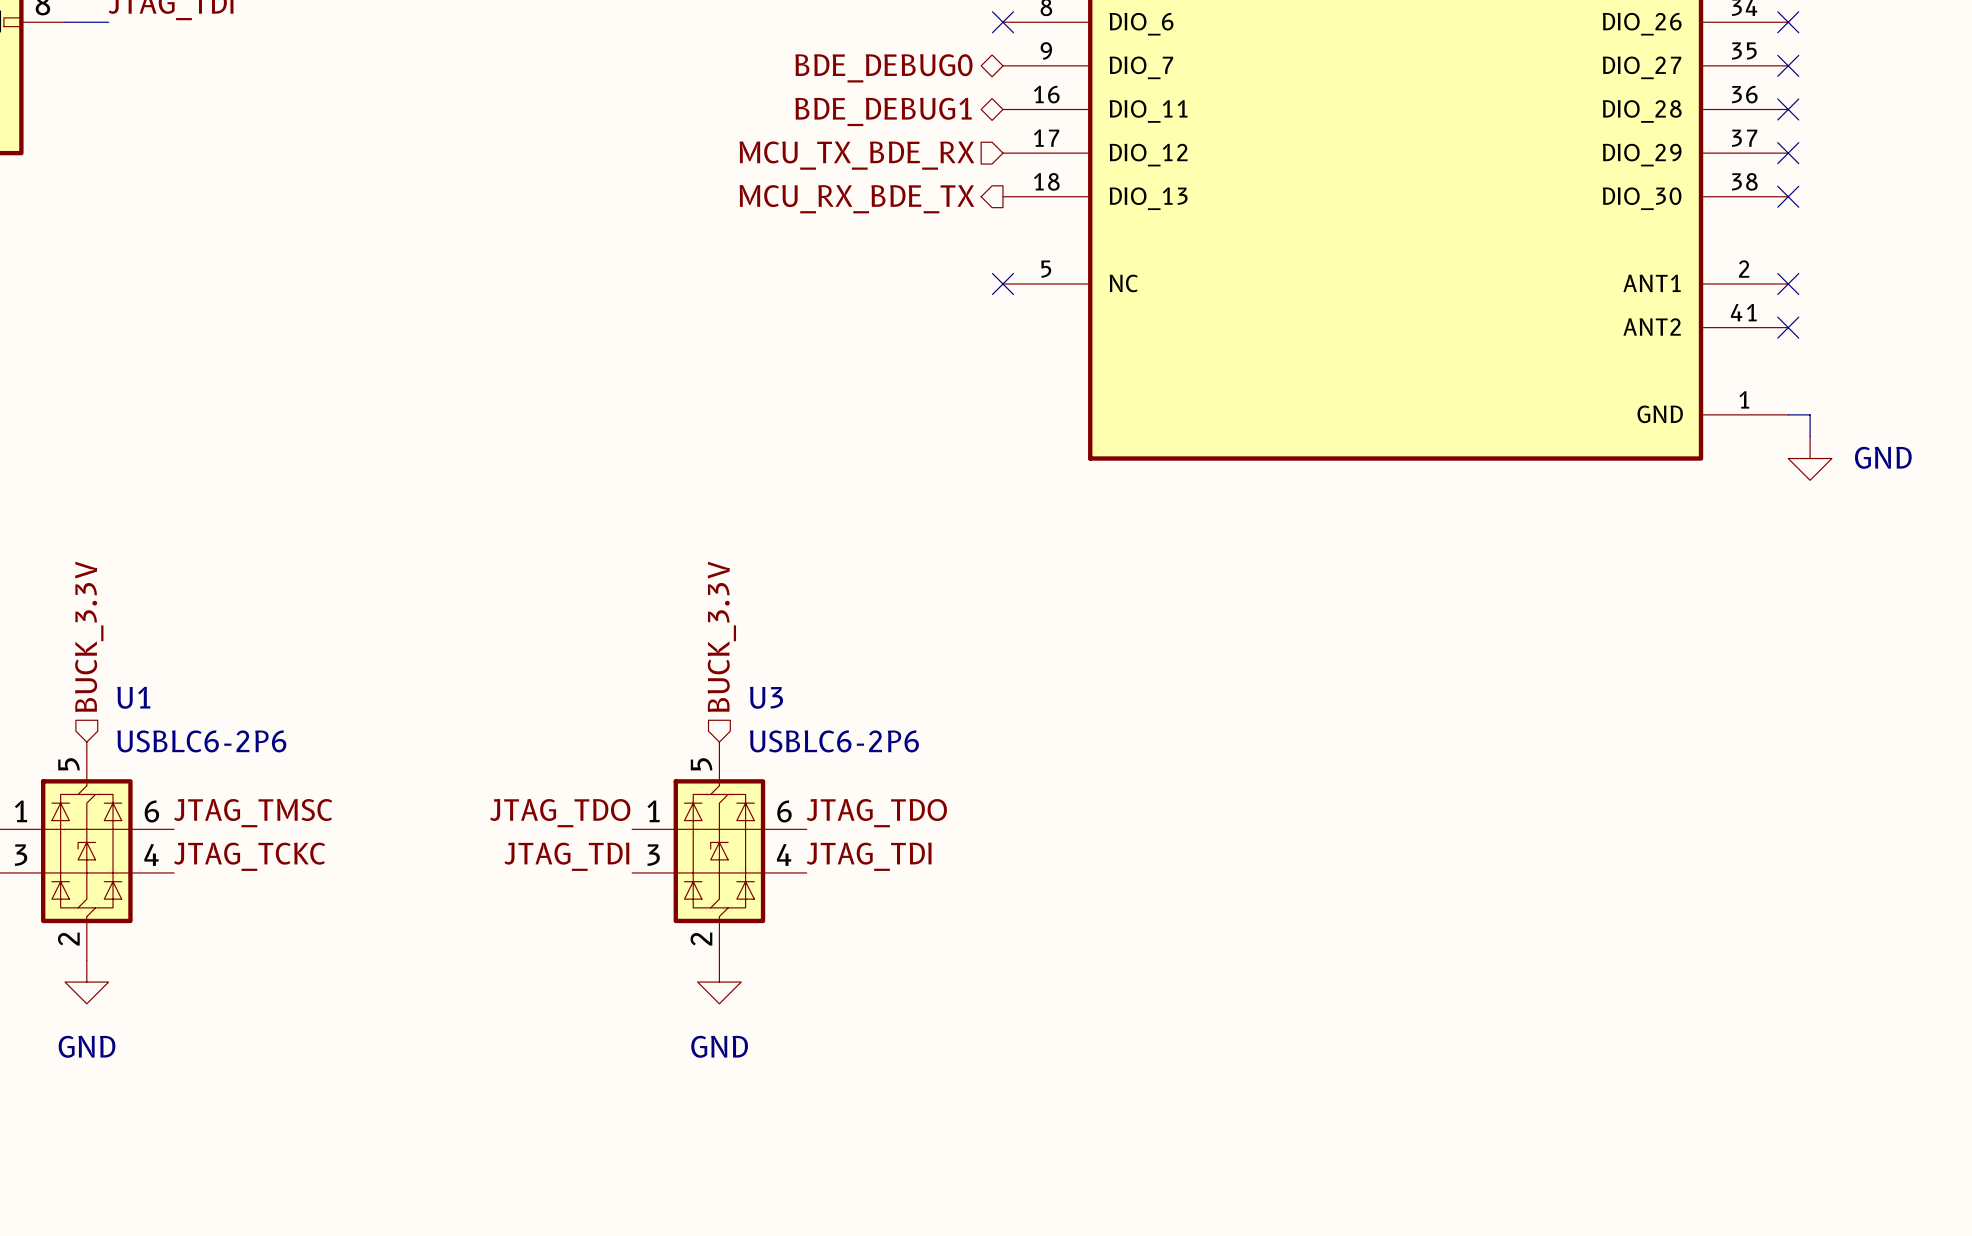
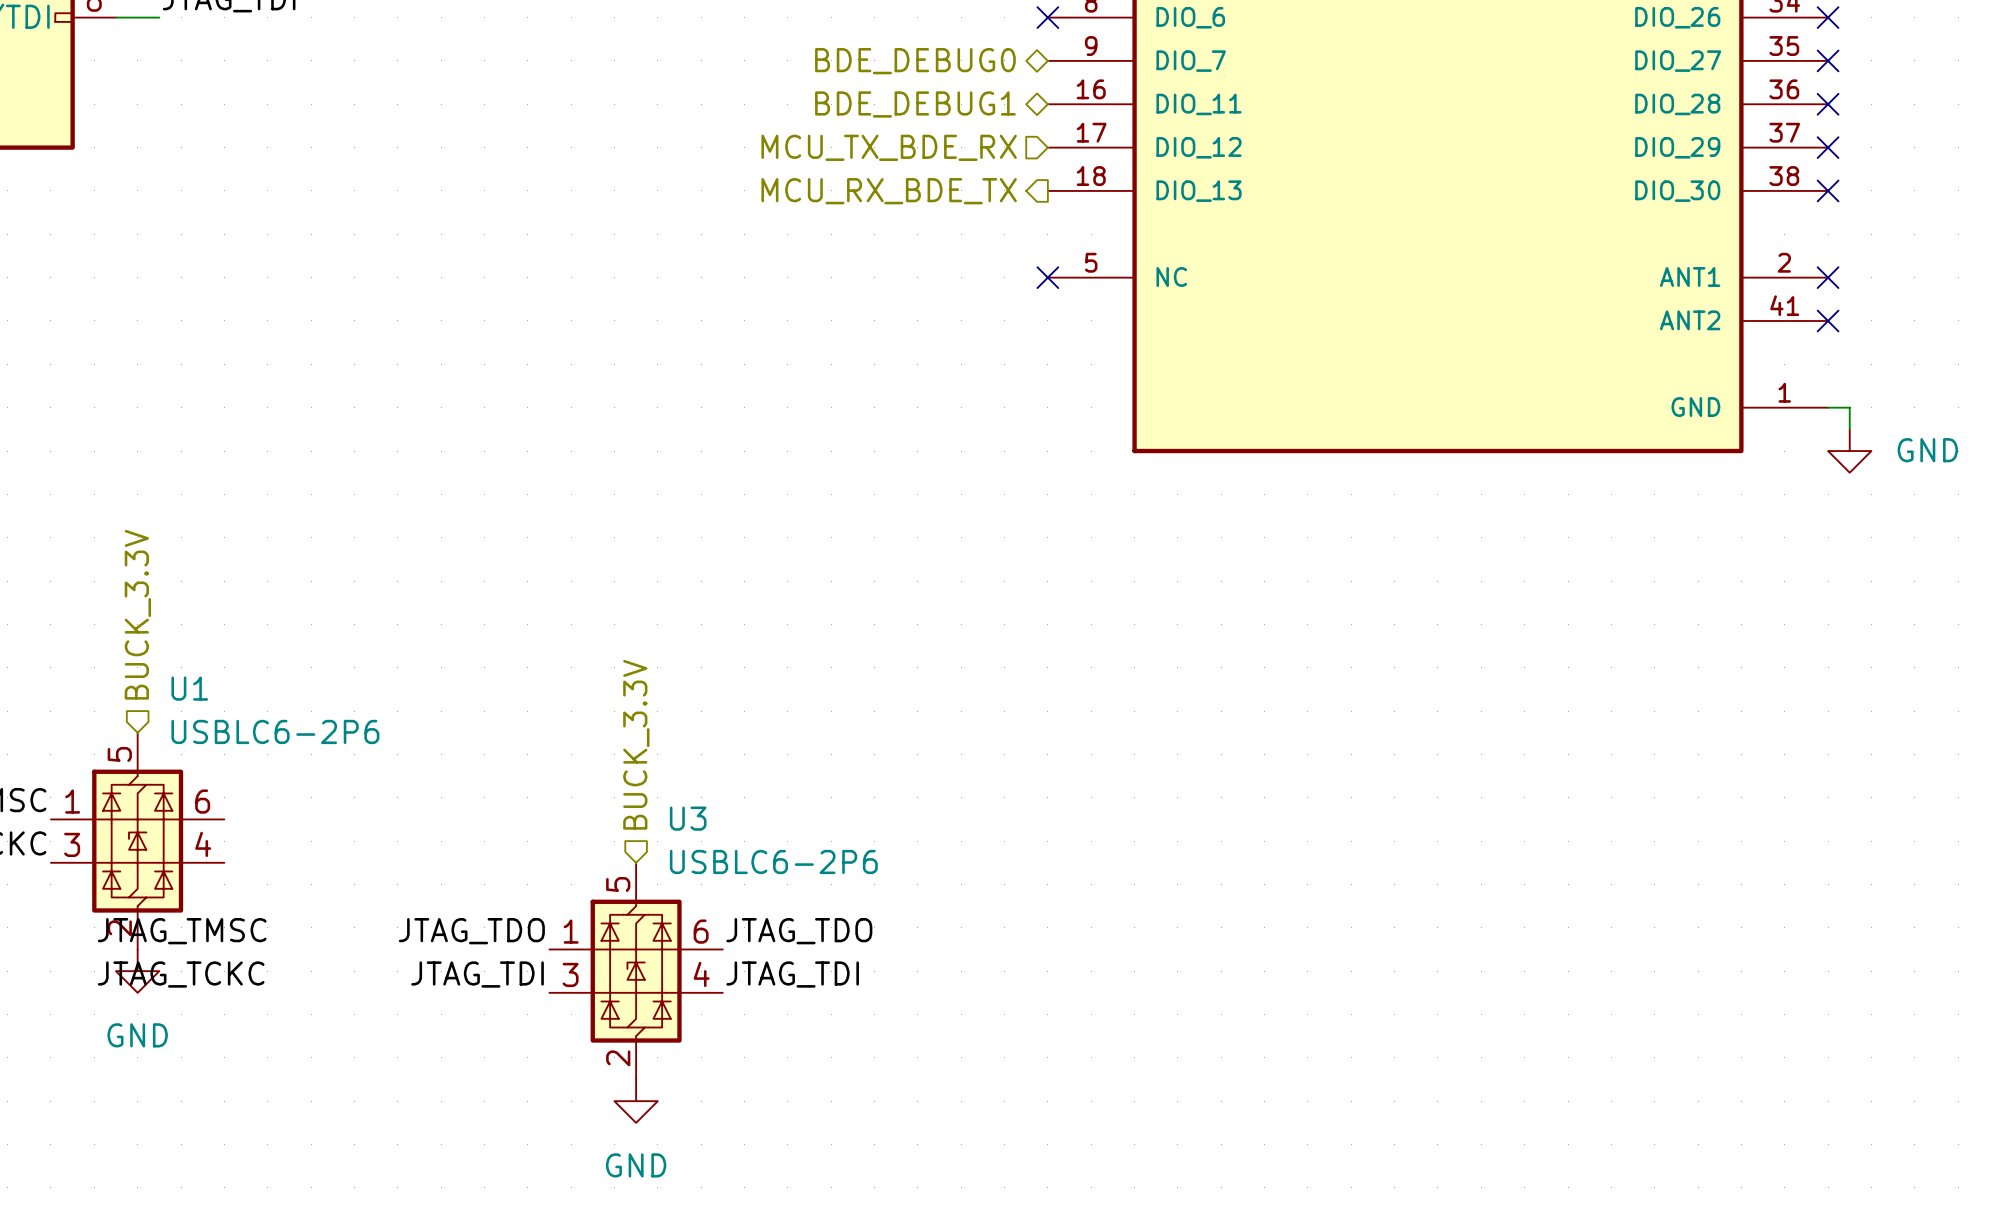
hierarchical label position: BUCK_3.3V (721, 636) -> BUCK_3.3V (636, 744)
label: JTAG_TMSC (253, 813) -> none
label: JTAG_TDO (560, 813) -> none
label: JTAG_TDO (876, 813) -> none
U3 position: (719, 851) -> (636, 971)
label: JTAG_TCKC (249, 856) -> none
label: JTAG_TDI (566, 856) -> none
label: JTAG_TDI (869, 856) -> none
label: none -> JTAG_TMSC (182, 931)
label: none -> JTAG_TDO (471, 931)
label: none -> JTAG_TDO (799, 931)
power symbol position: GND (719, 982) -> GND (636, 1101)
label: none -> JTAG_TCKC (181, 974)
label: none -> JTAG_TDI (477, 974)
label: none -> JTAG_TDI (792, 974)

